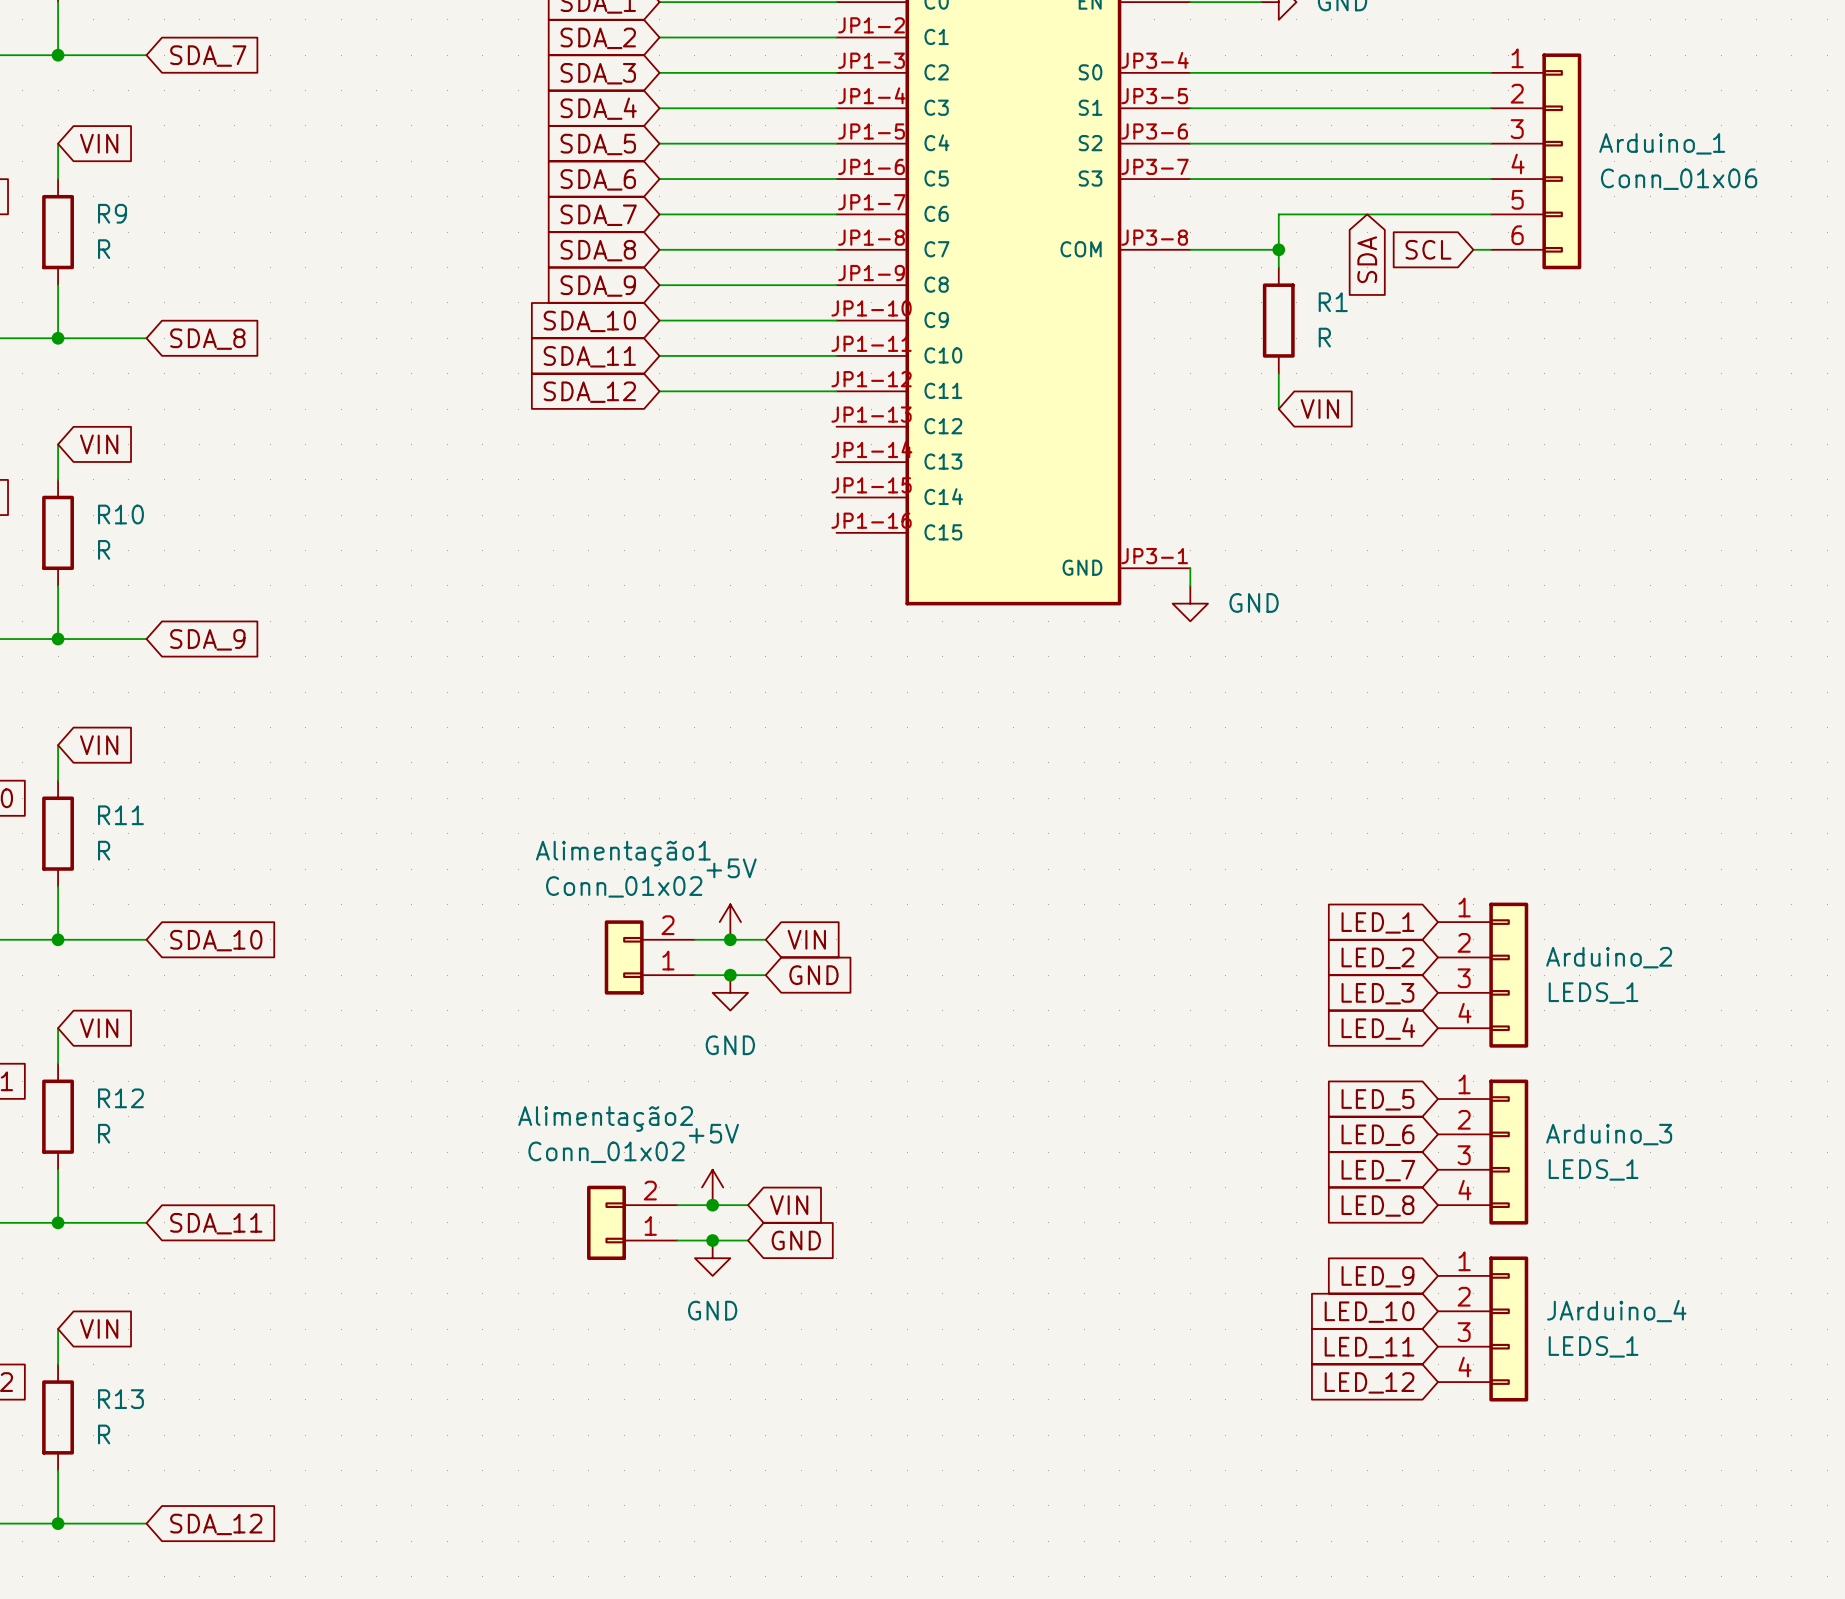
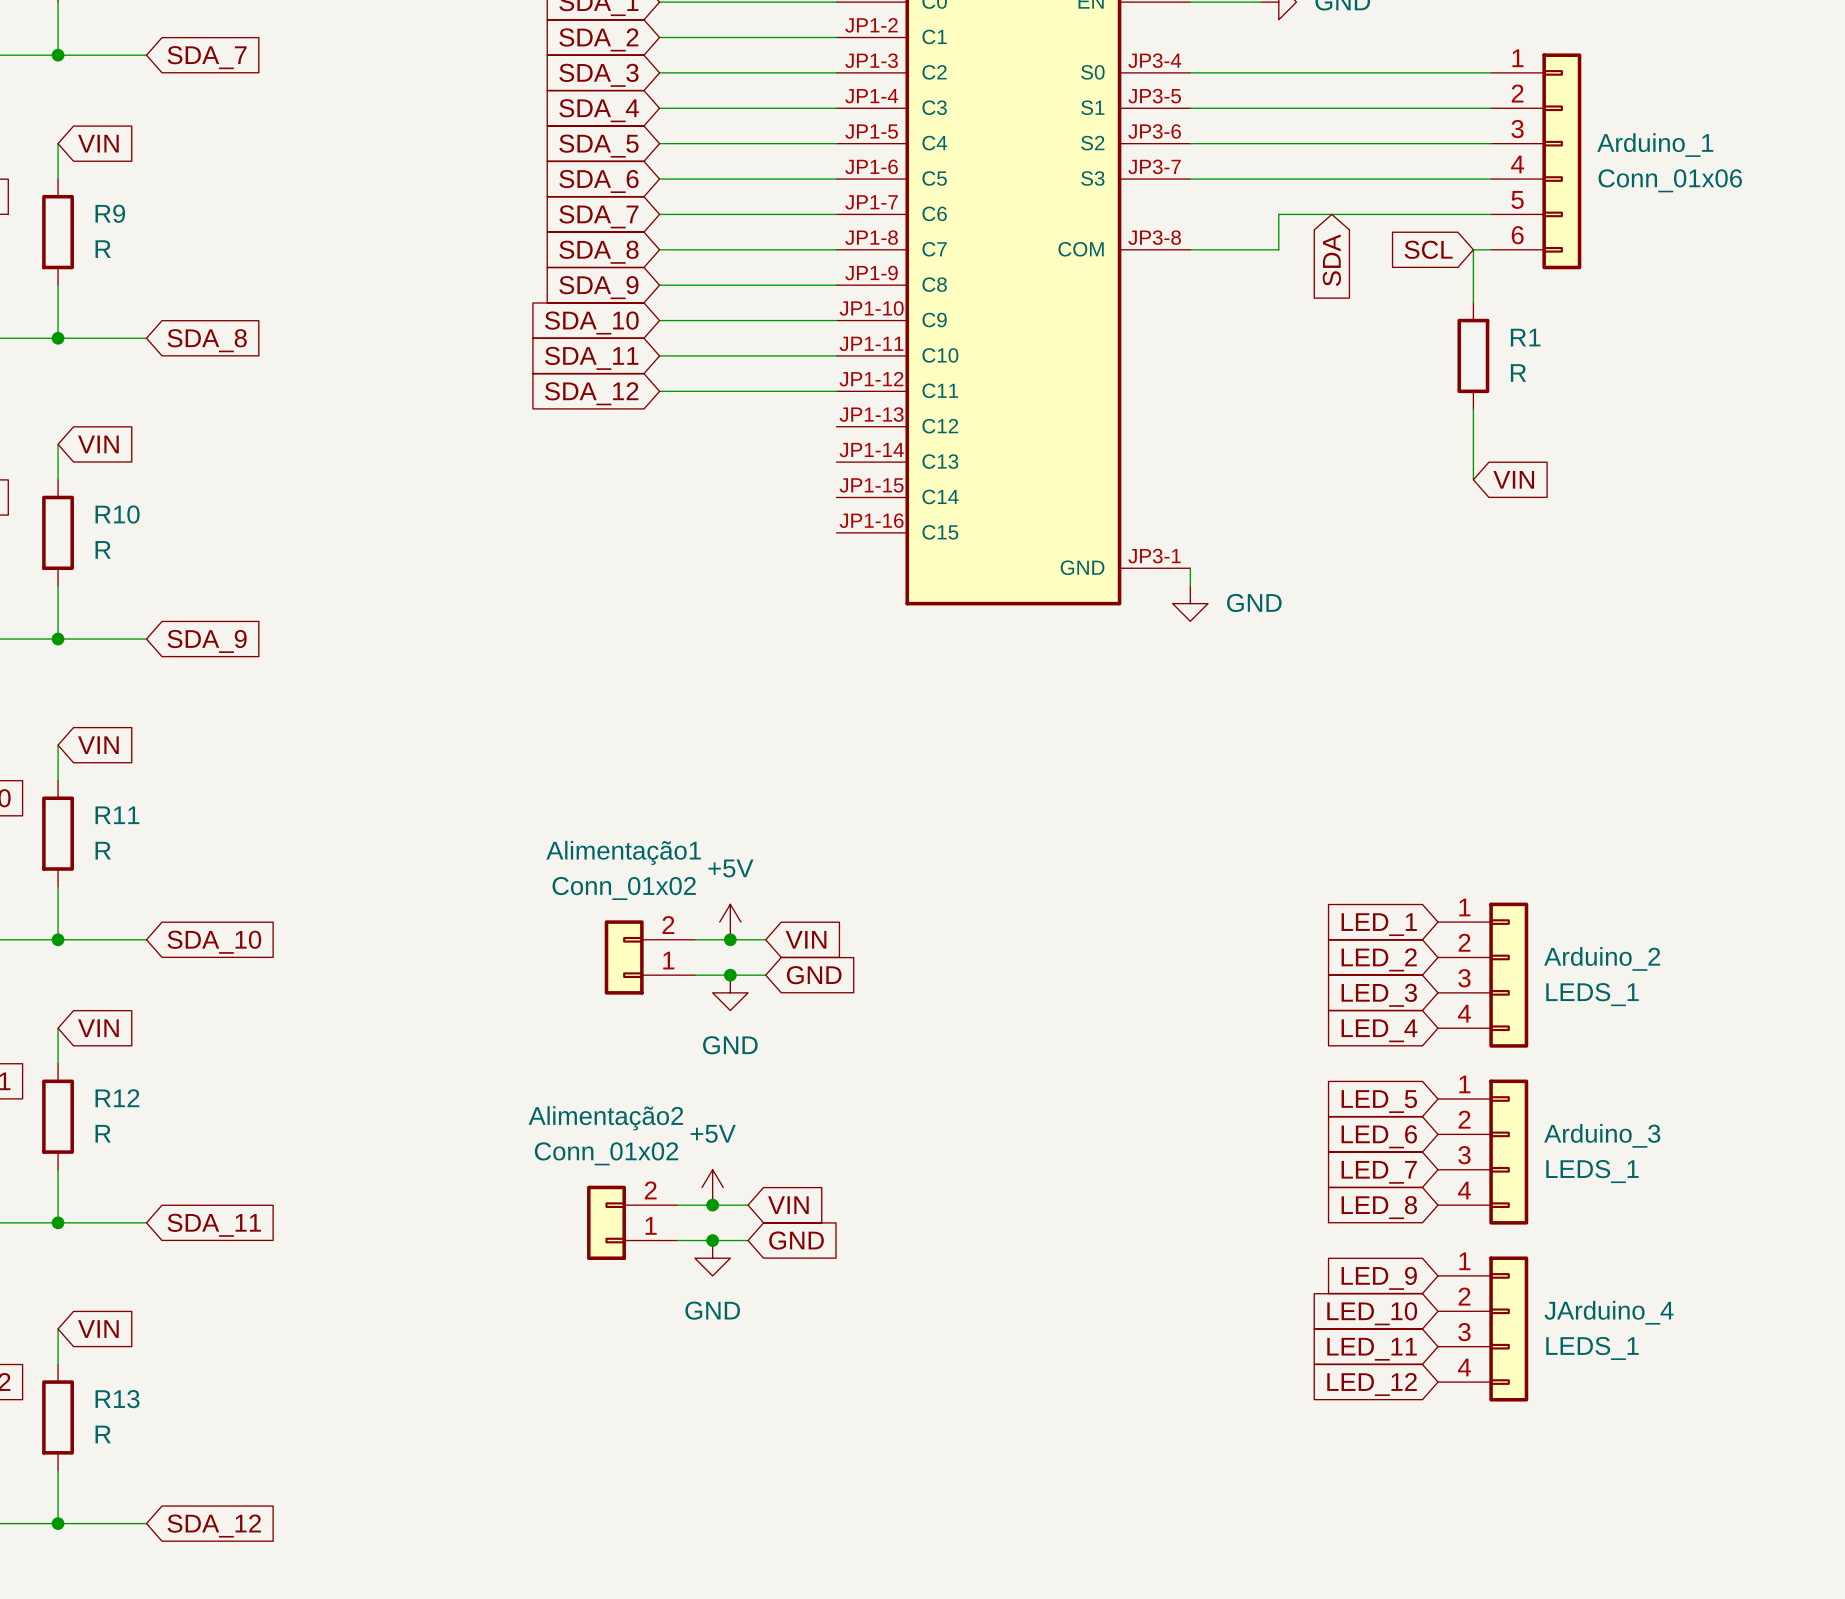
wire: (1278, 249) (1278, 267) -> none
junction: (1278, 249) -> none
wire: none -> (1473, 249) (1473, 302)
global label position: SDA (1367, 259) -> SDA (1331, 260)
R1 position: (1278, 320) -> (1473, 355)
wire: (1278, 373) (1278, 409) -> none
global label position: VIN (1319, 409) -> VIN (1513, 479)
wire: none -> (1473, 409) (1473, 479)

